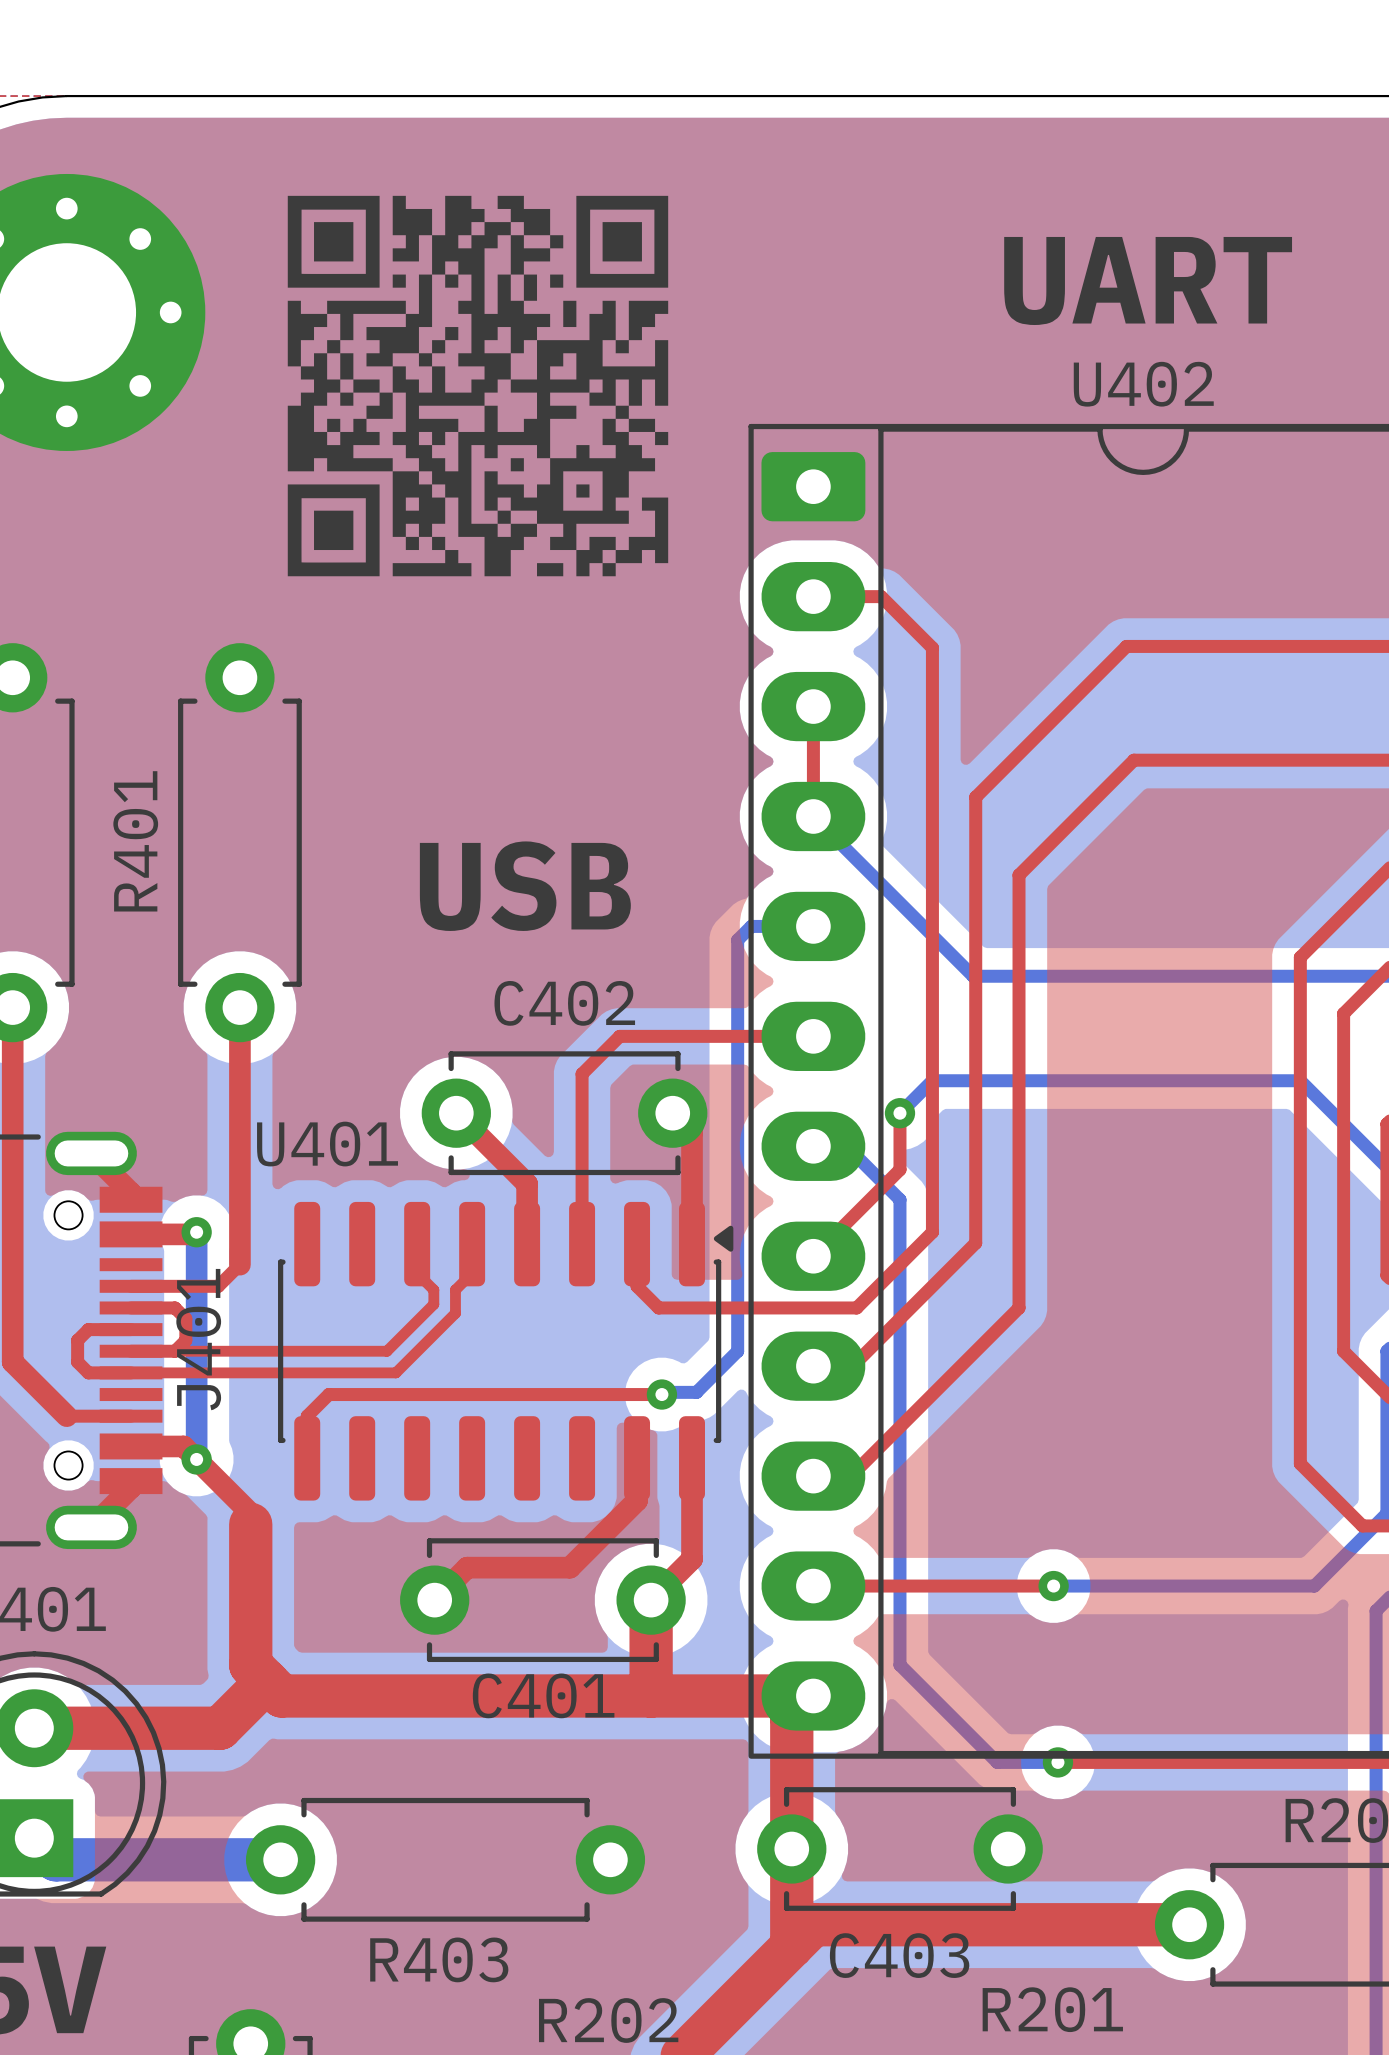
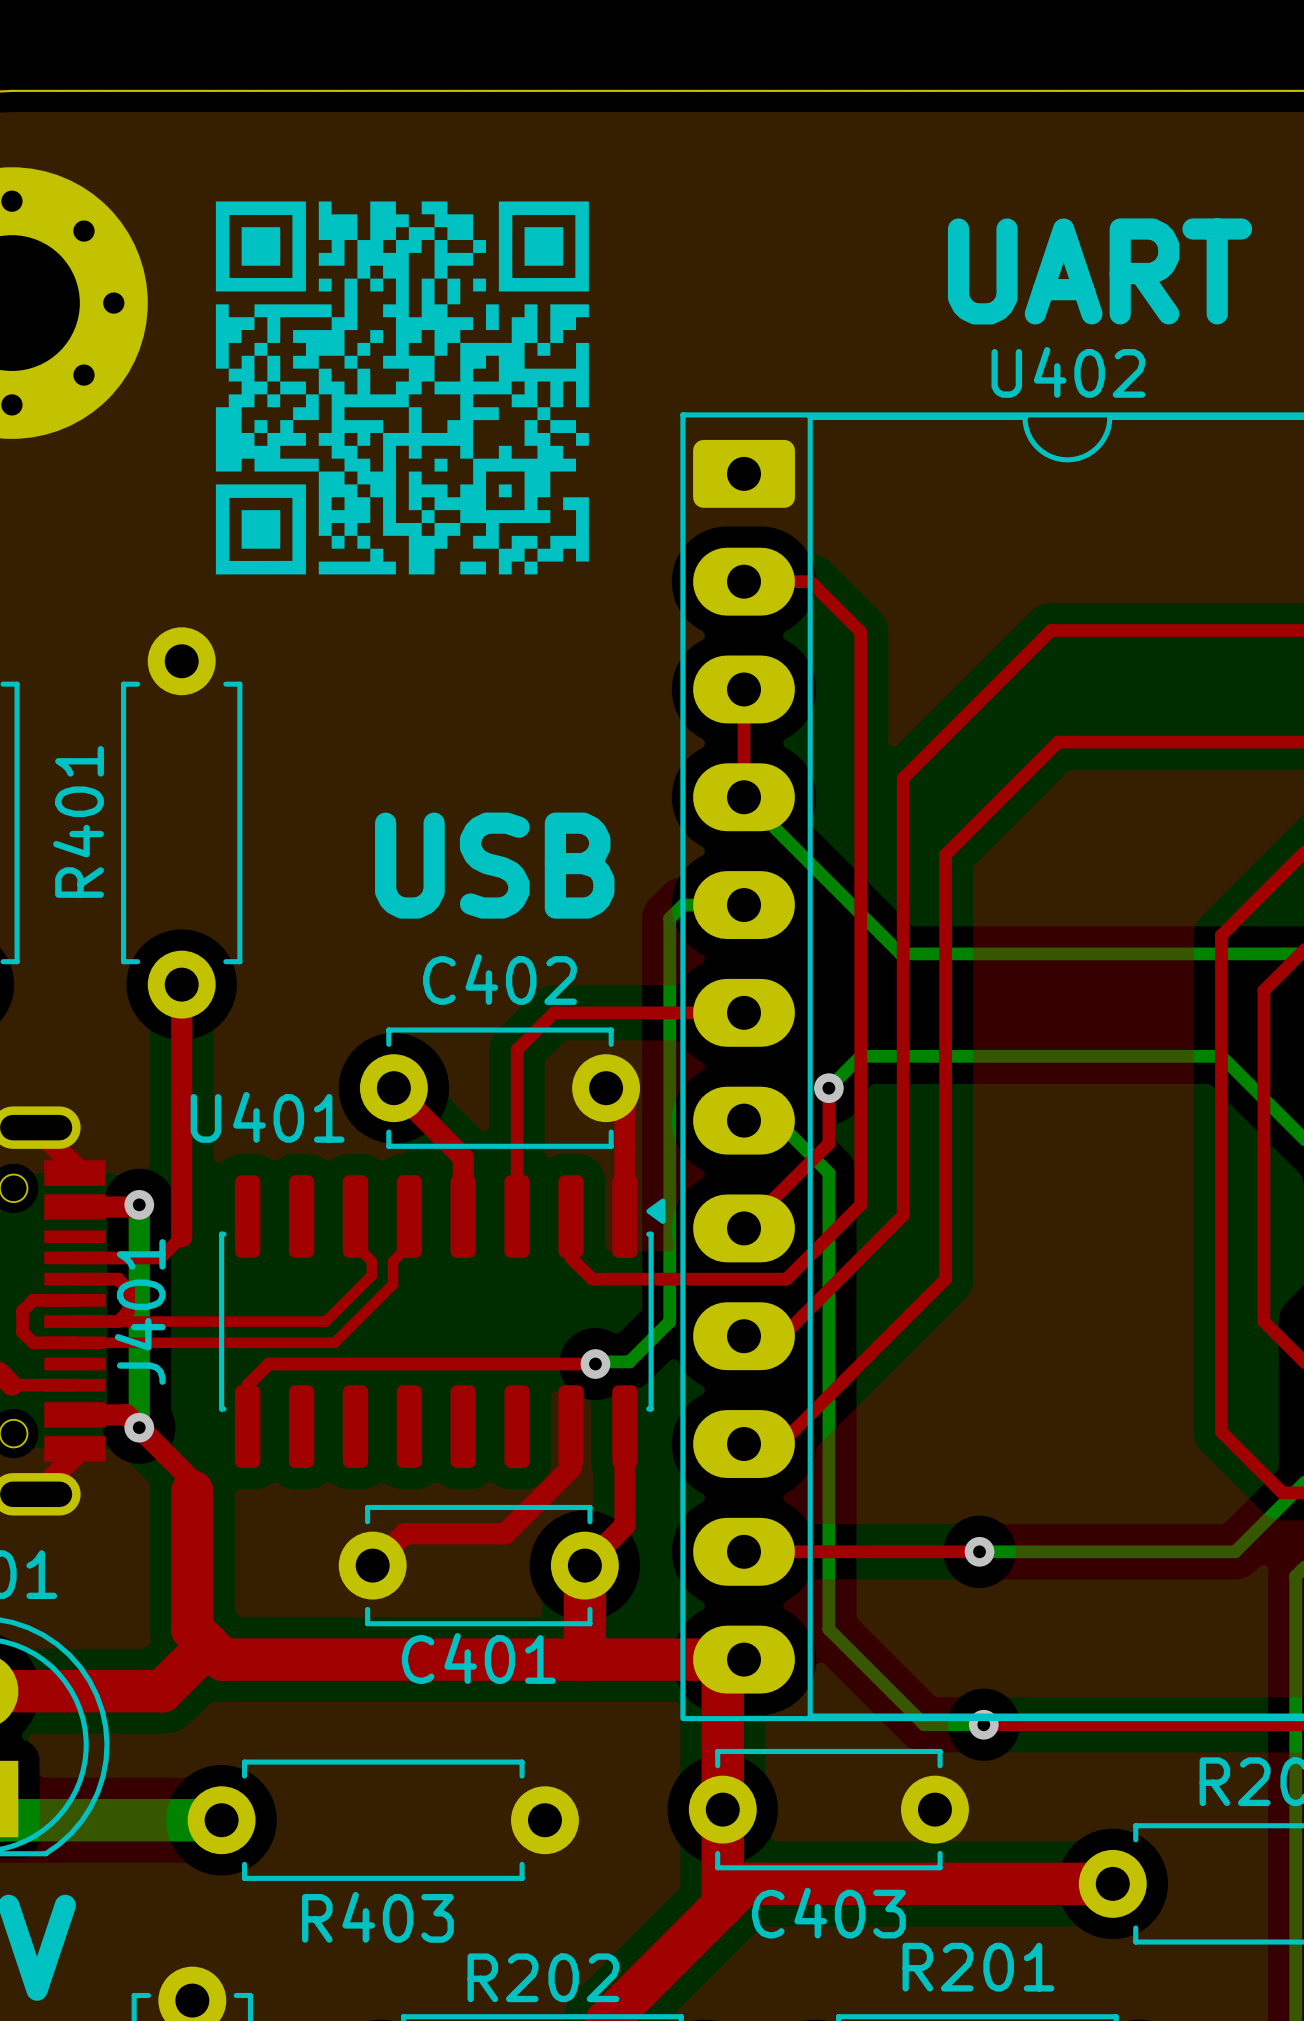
drawing position: (477, 386) -> (402, 387)

